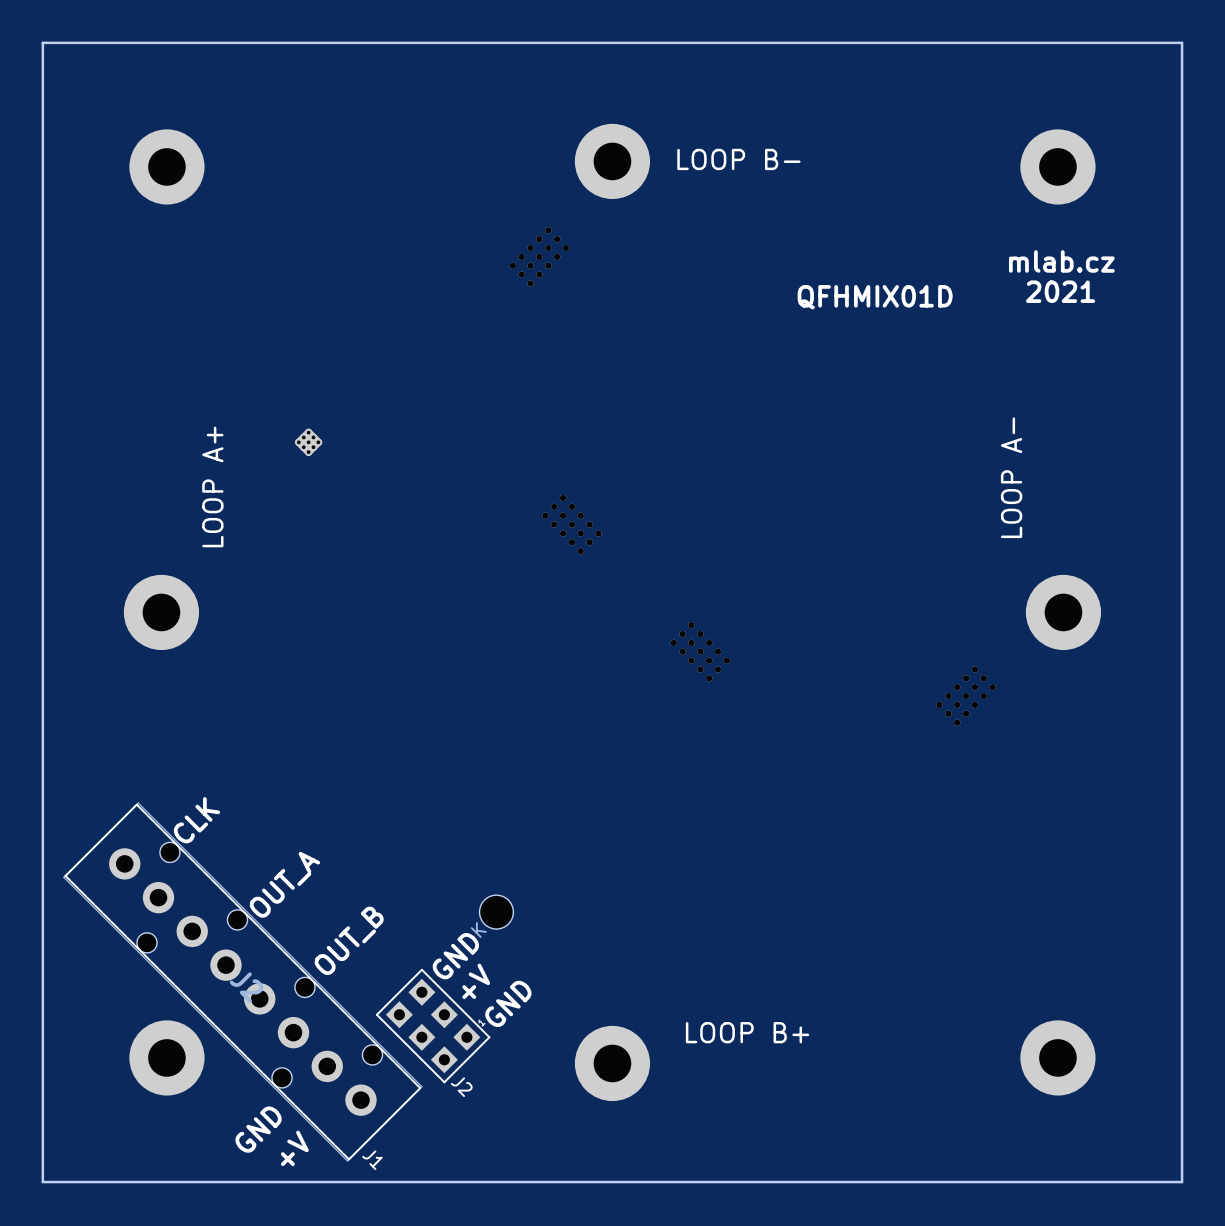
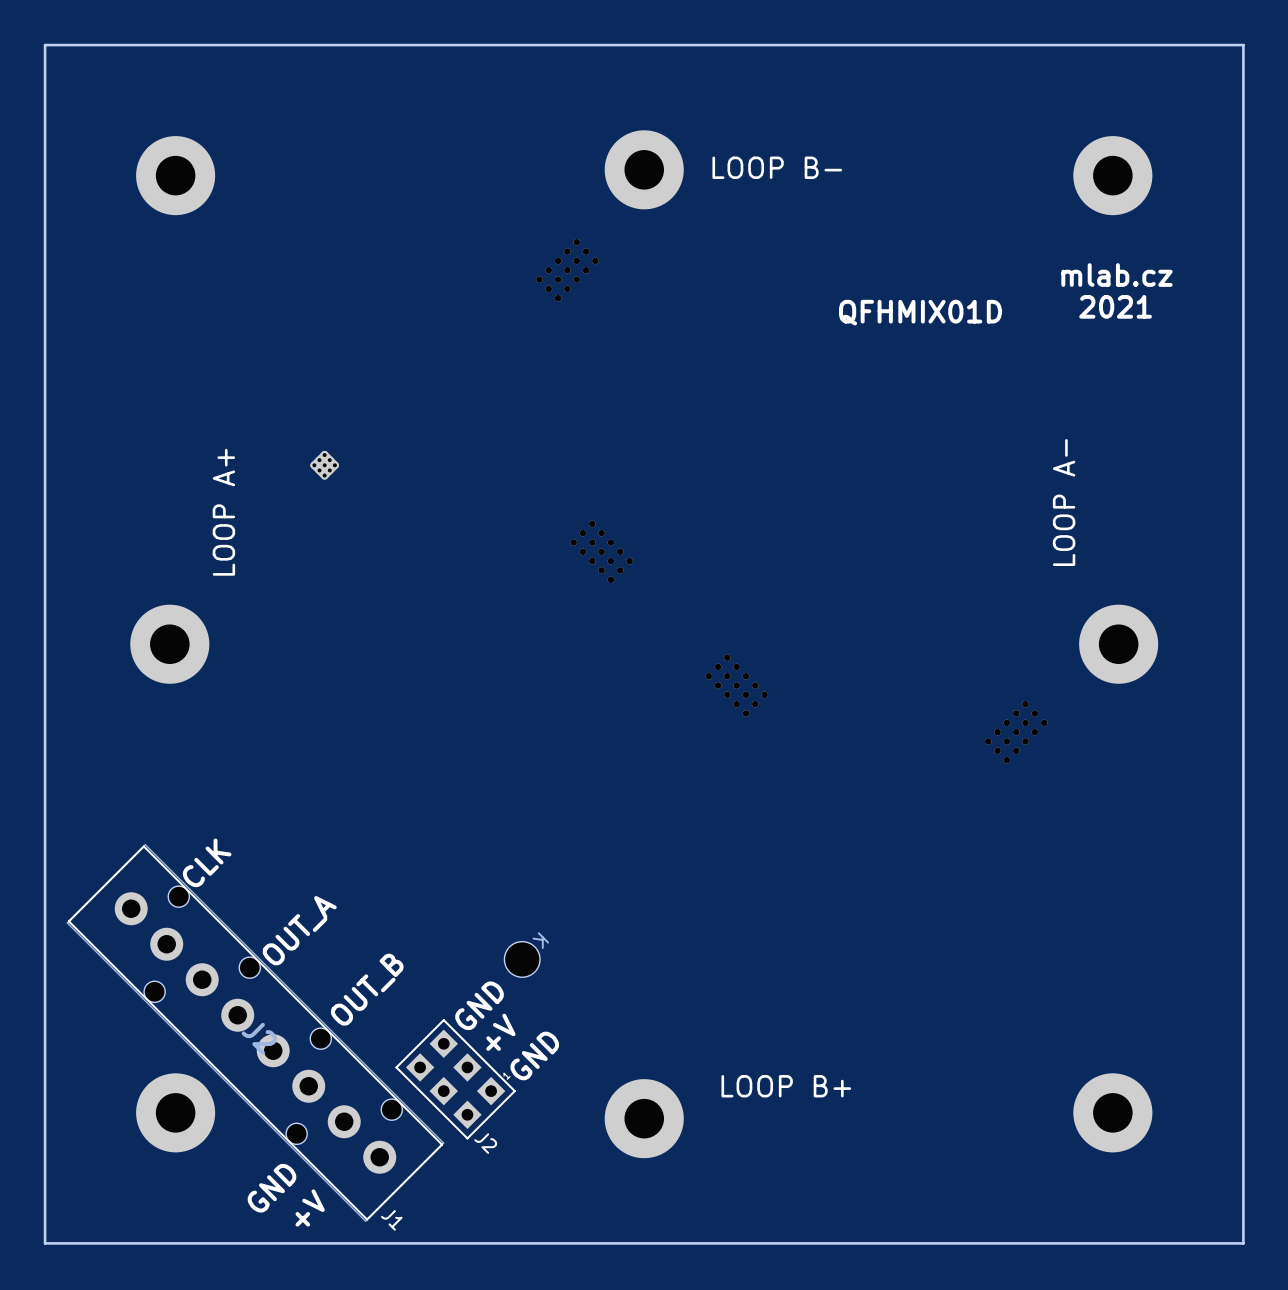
part rotation: 0° (496, 912) -> 180° (522, 959)

